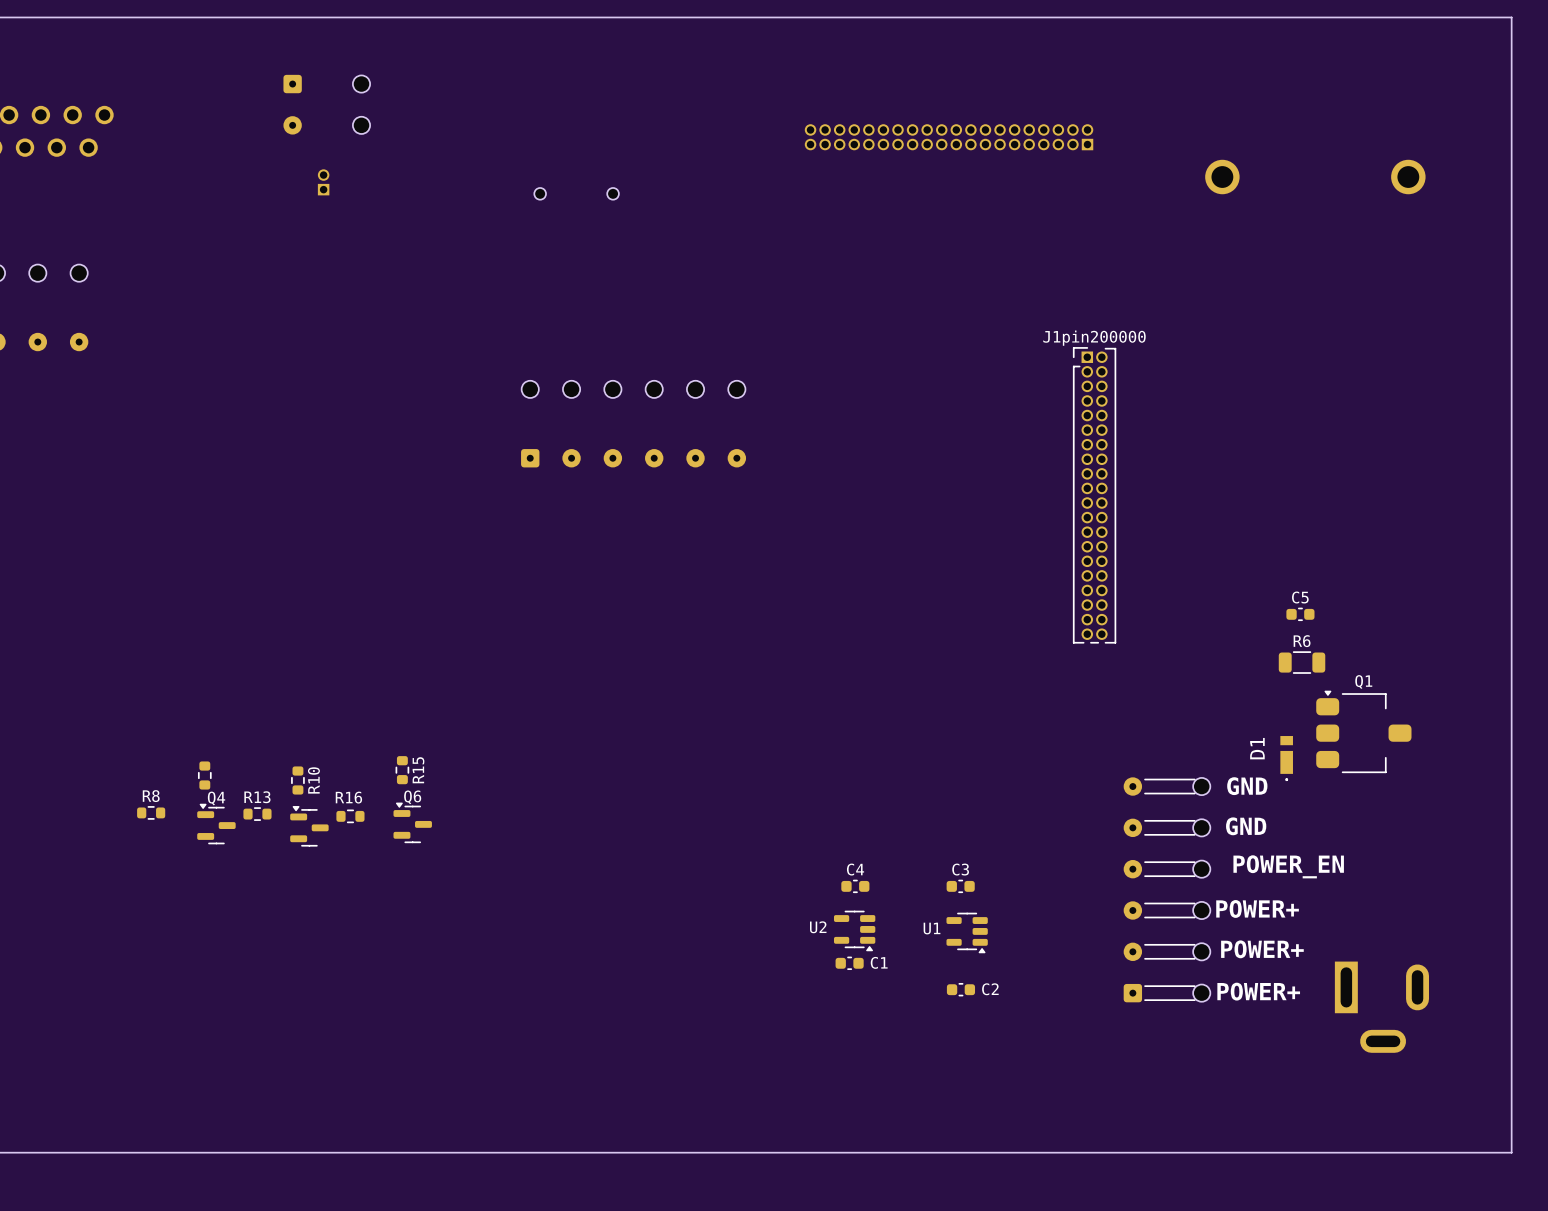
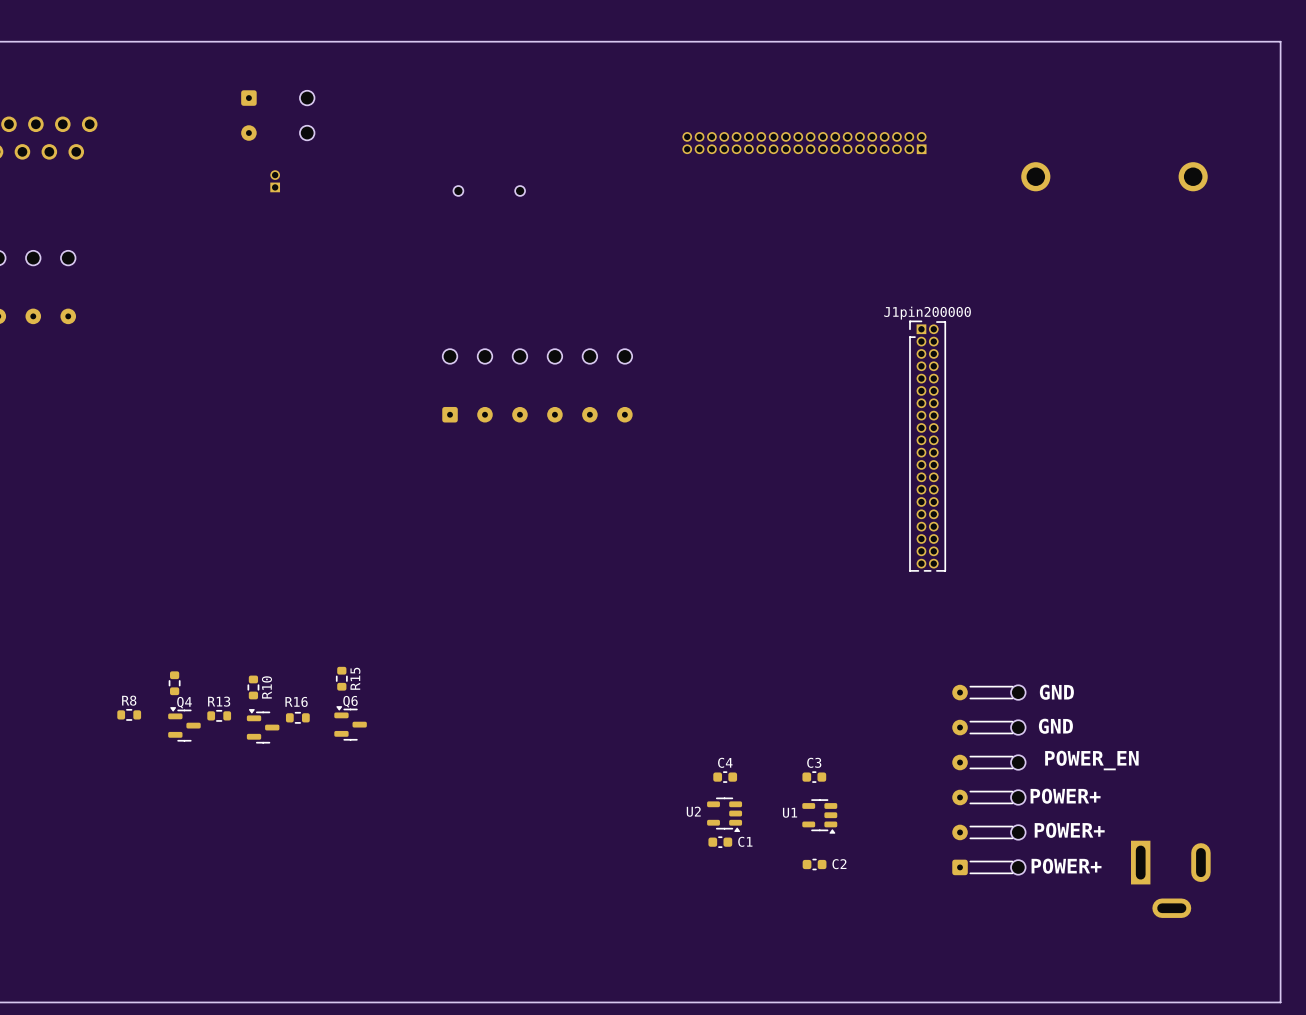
C5: (1300, 614) -> none
R6: (1302, 662) -> none
Q1: (1363, 731) -> none
D1: (1286, 758) -> none

